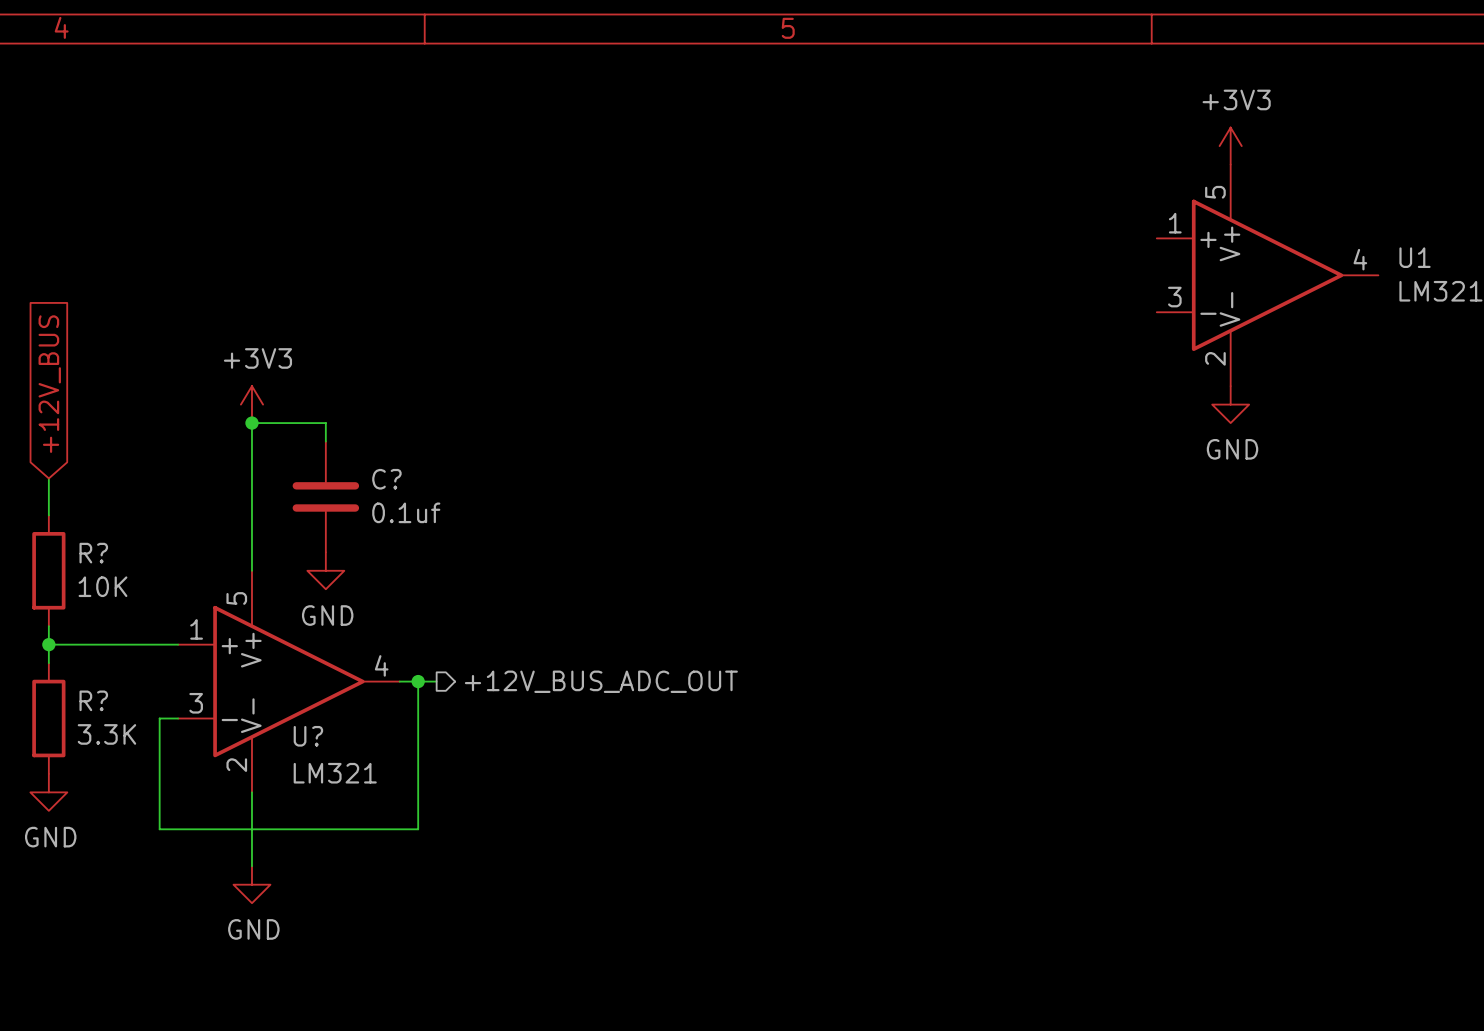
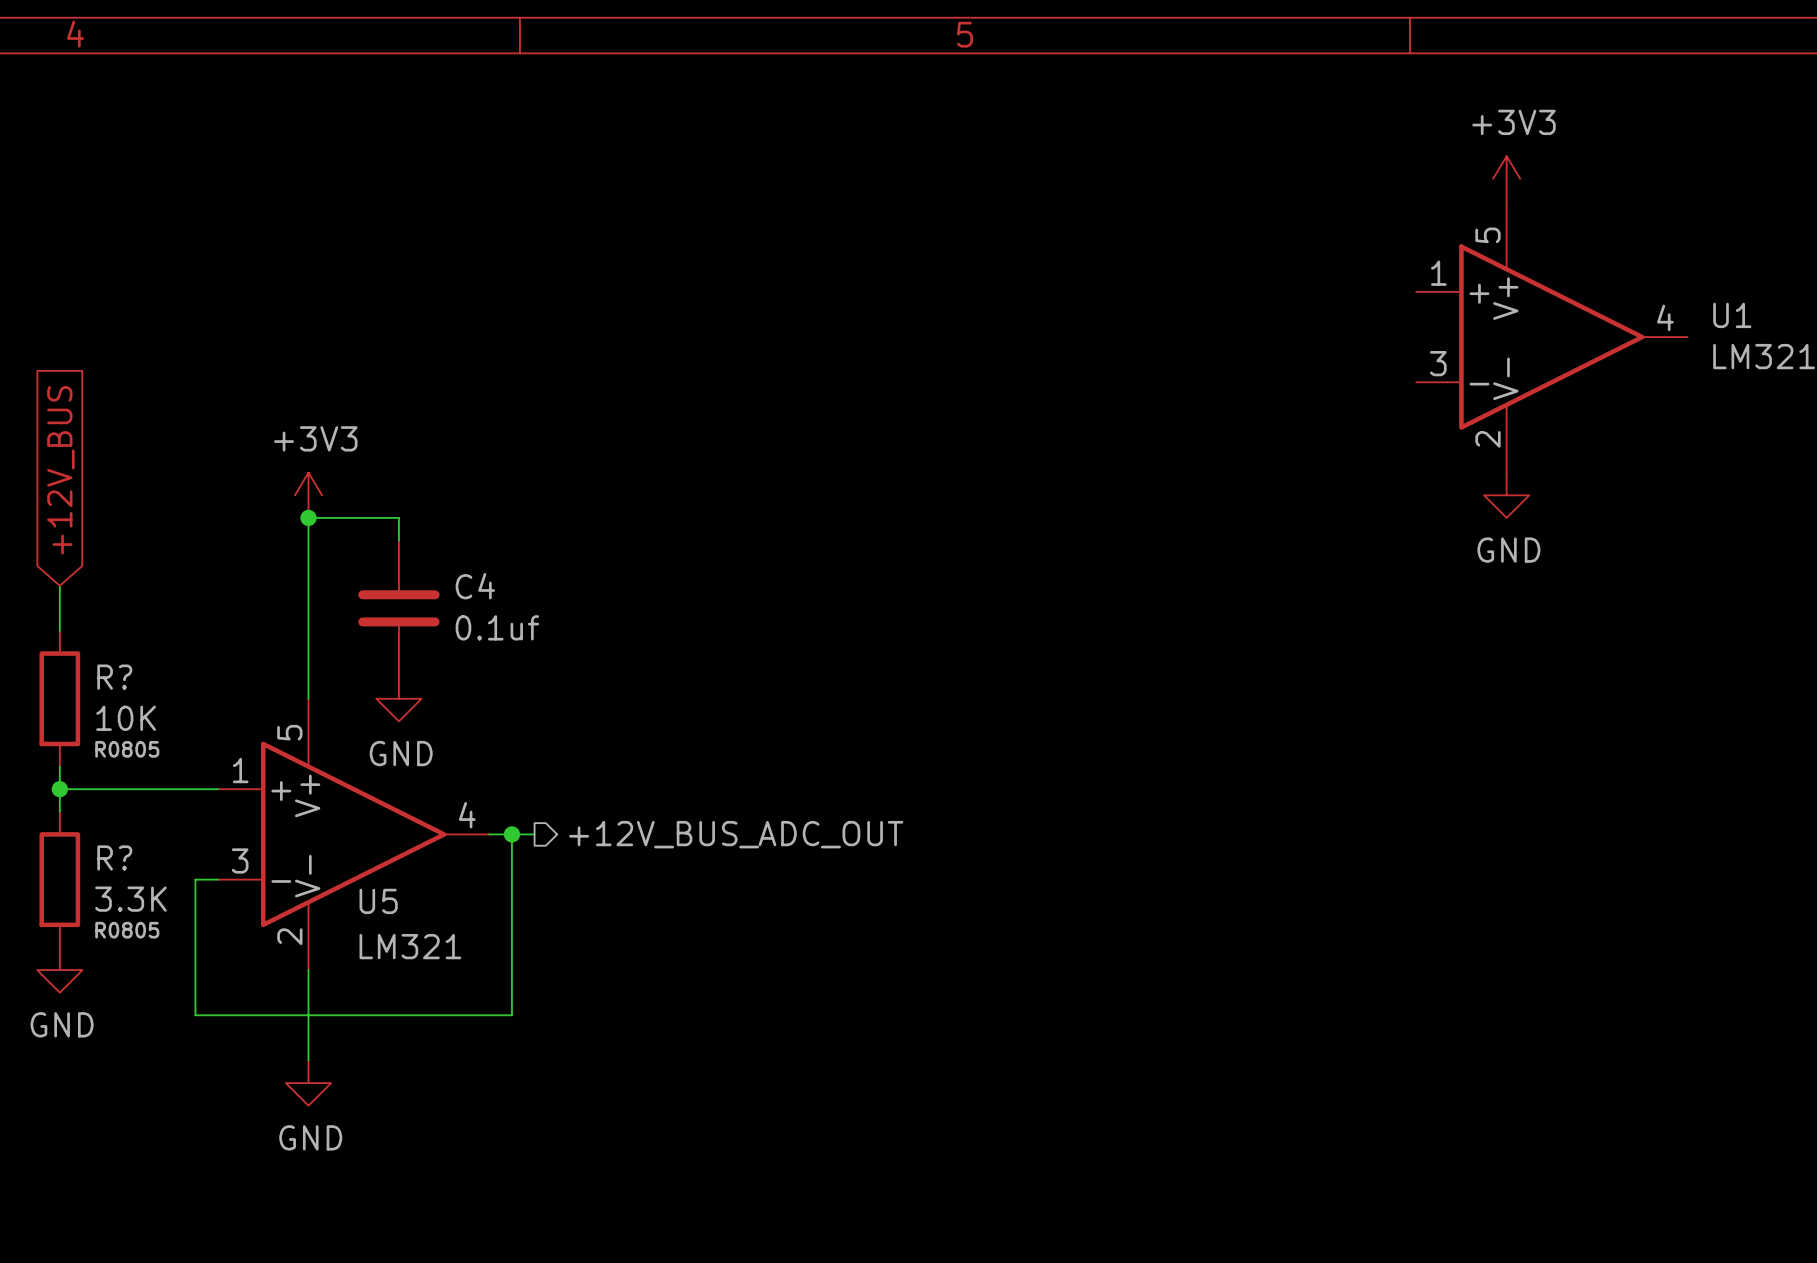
C? name: C? (386, 479) -> C4 (475, 586)
R? text: none -> R0805 (127, 749)
U? name: U? (308, 736) -> U5 (378, 901)
R? text: none -> R0805 (127, 930)

